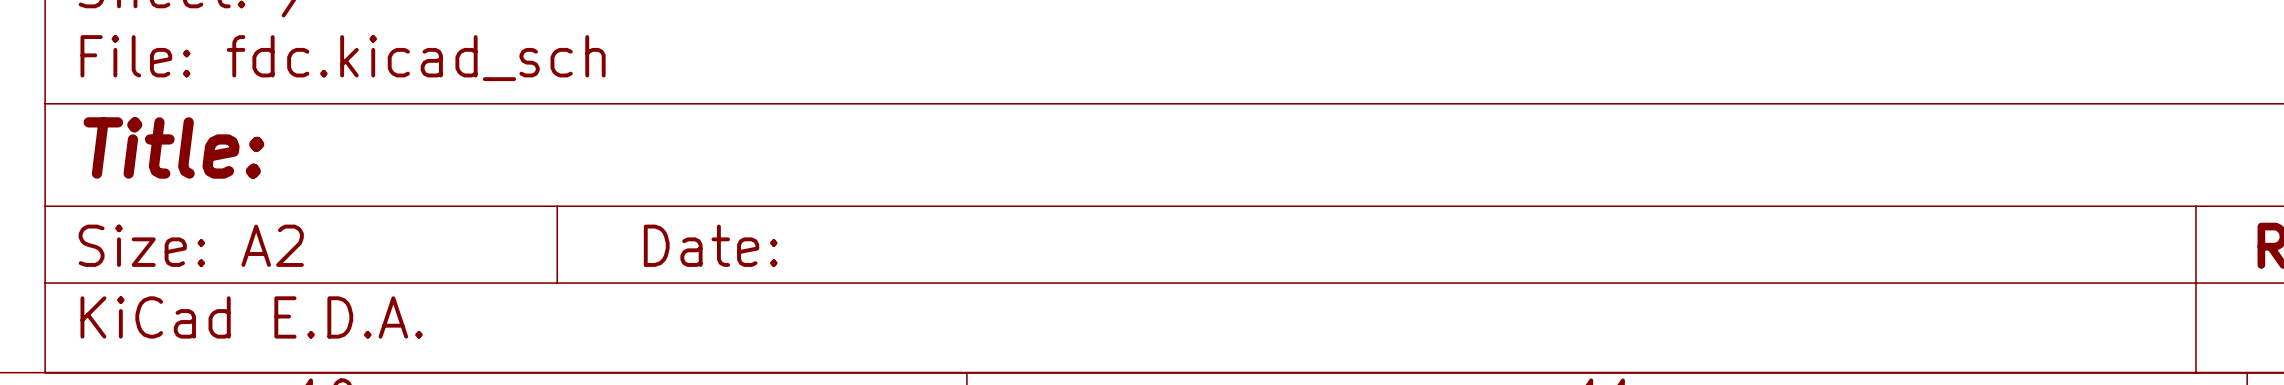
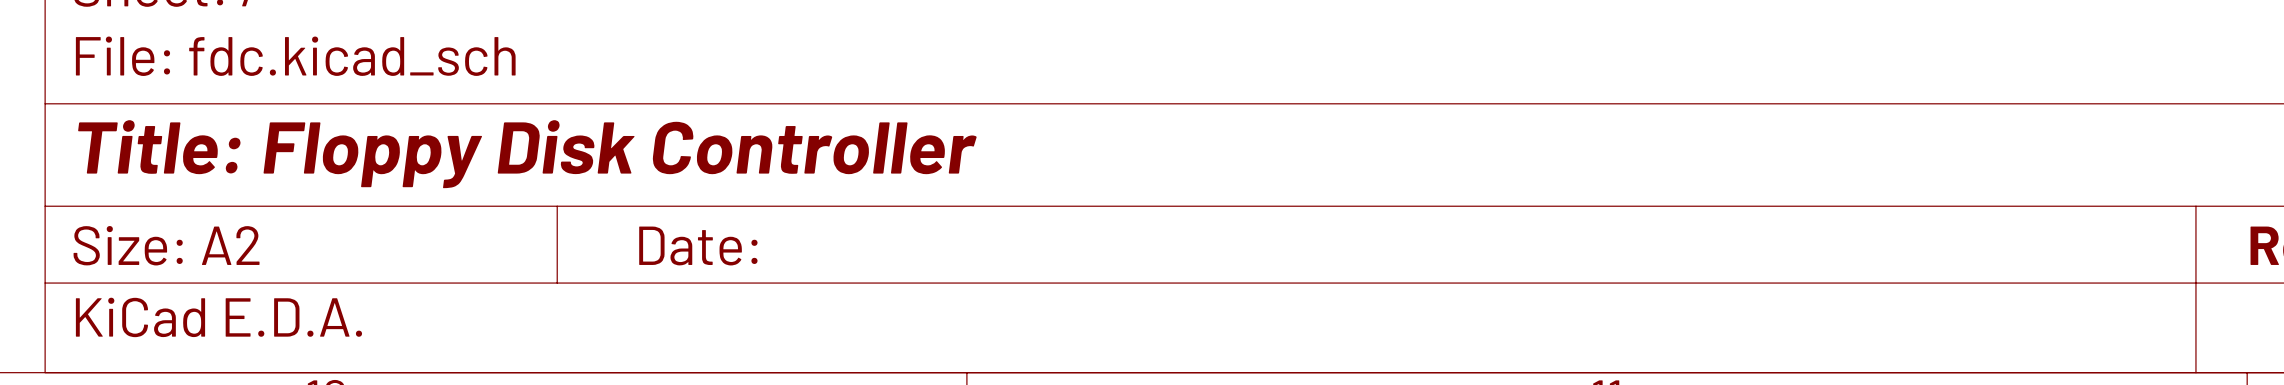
title block: Title: (173, 147) -> Title: Floppy Disk Controller (527, 154)

